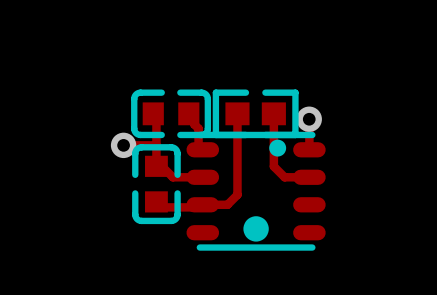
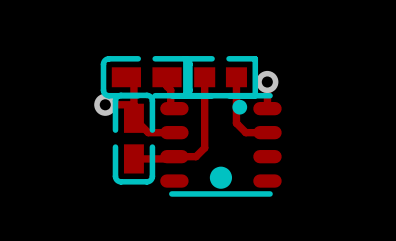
part footprint: [131, 89, 212, 139] -> [100, 56, 193, 99]
part footprint: [132, 144, 181, 225] -> [112, 92, 156, 185]

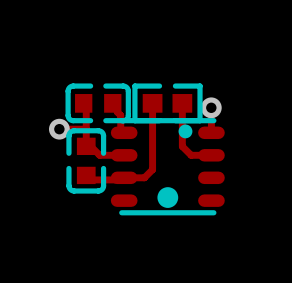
part footprint: [100, 56, 193, 99] -> [65, 83, 131, 124]
part footprint: [112, 92, 156, 185] -> [66, 128, 107, 194]

